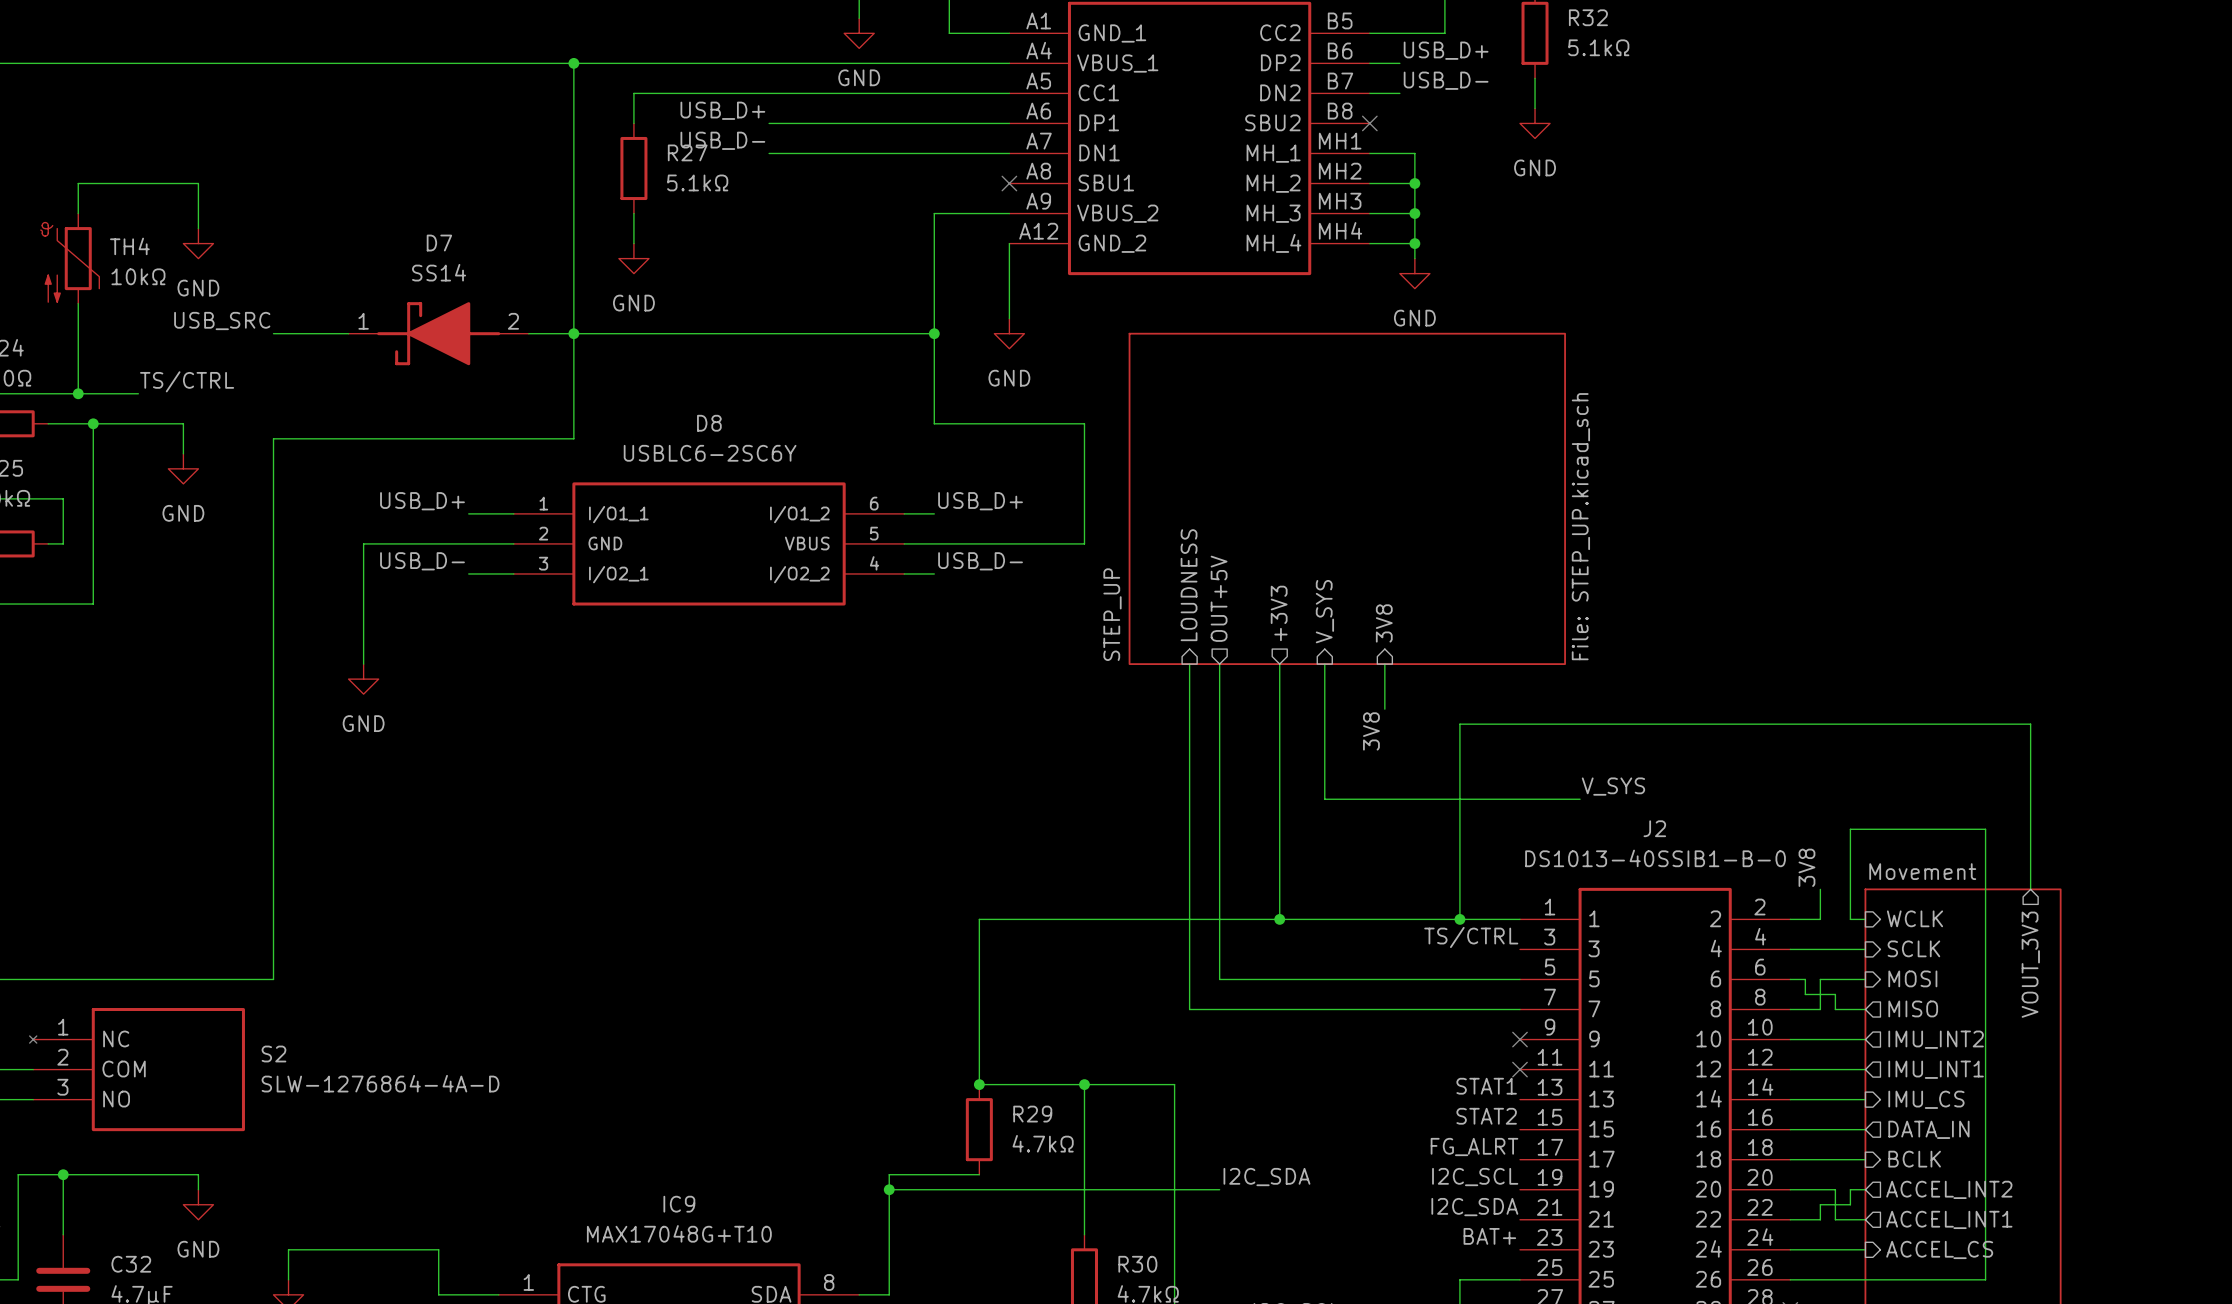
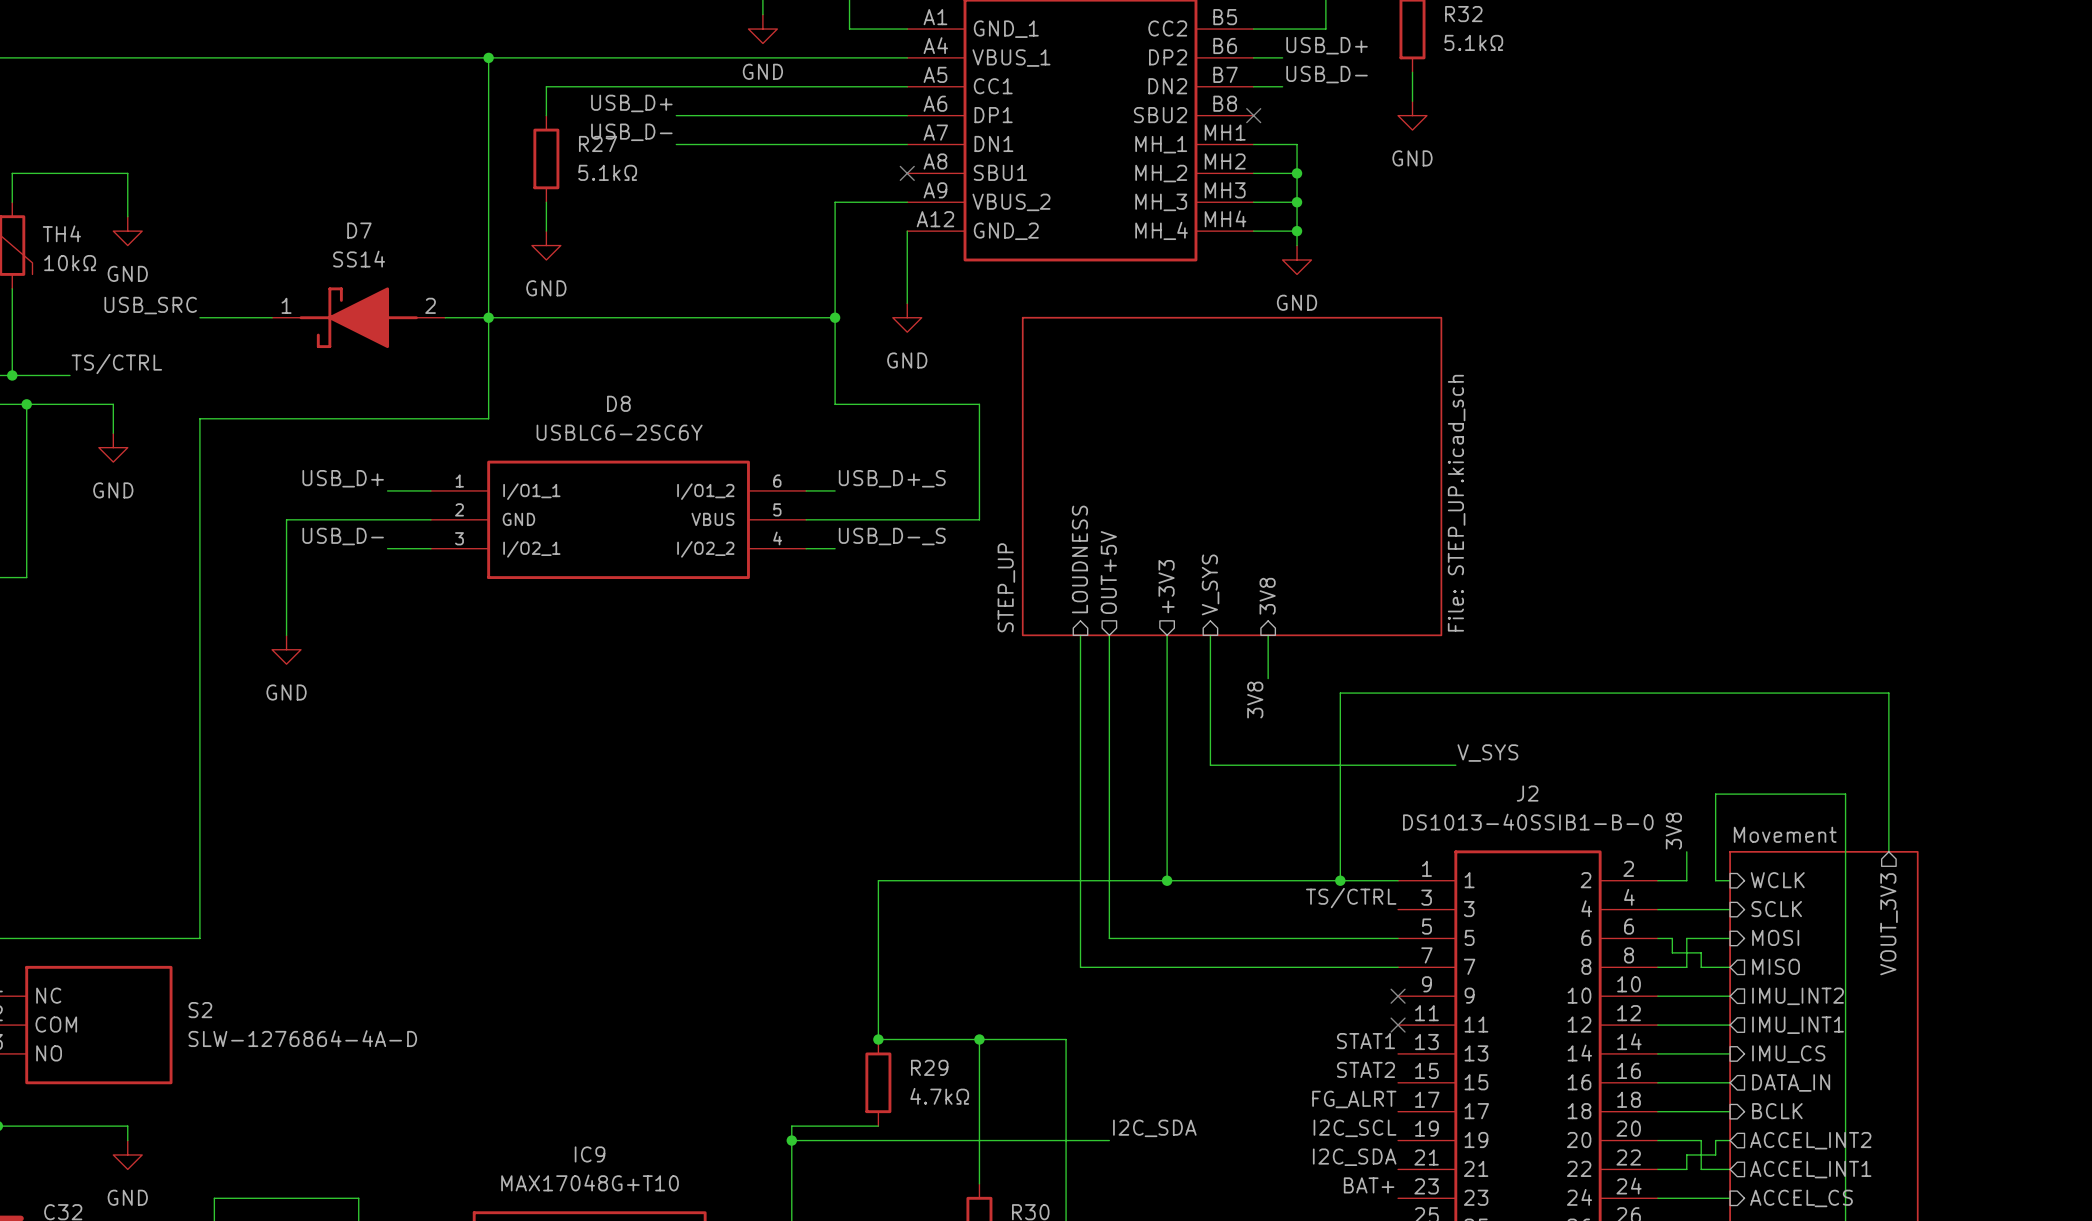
label: USB_D+ (980, 501) -> USB_D+_S (892, 478)
label: USB_D- (980, 561) -> USB_D-_S (892, 536)

